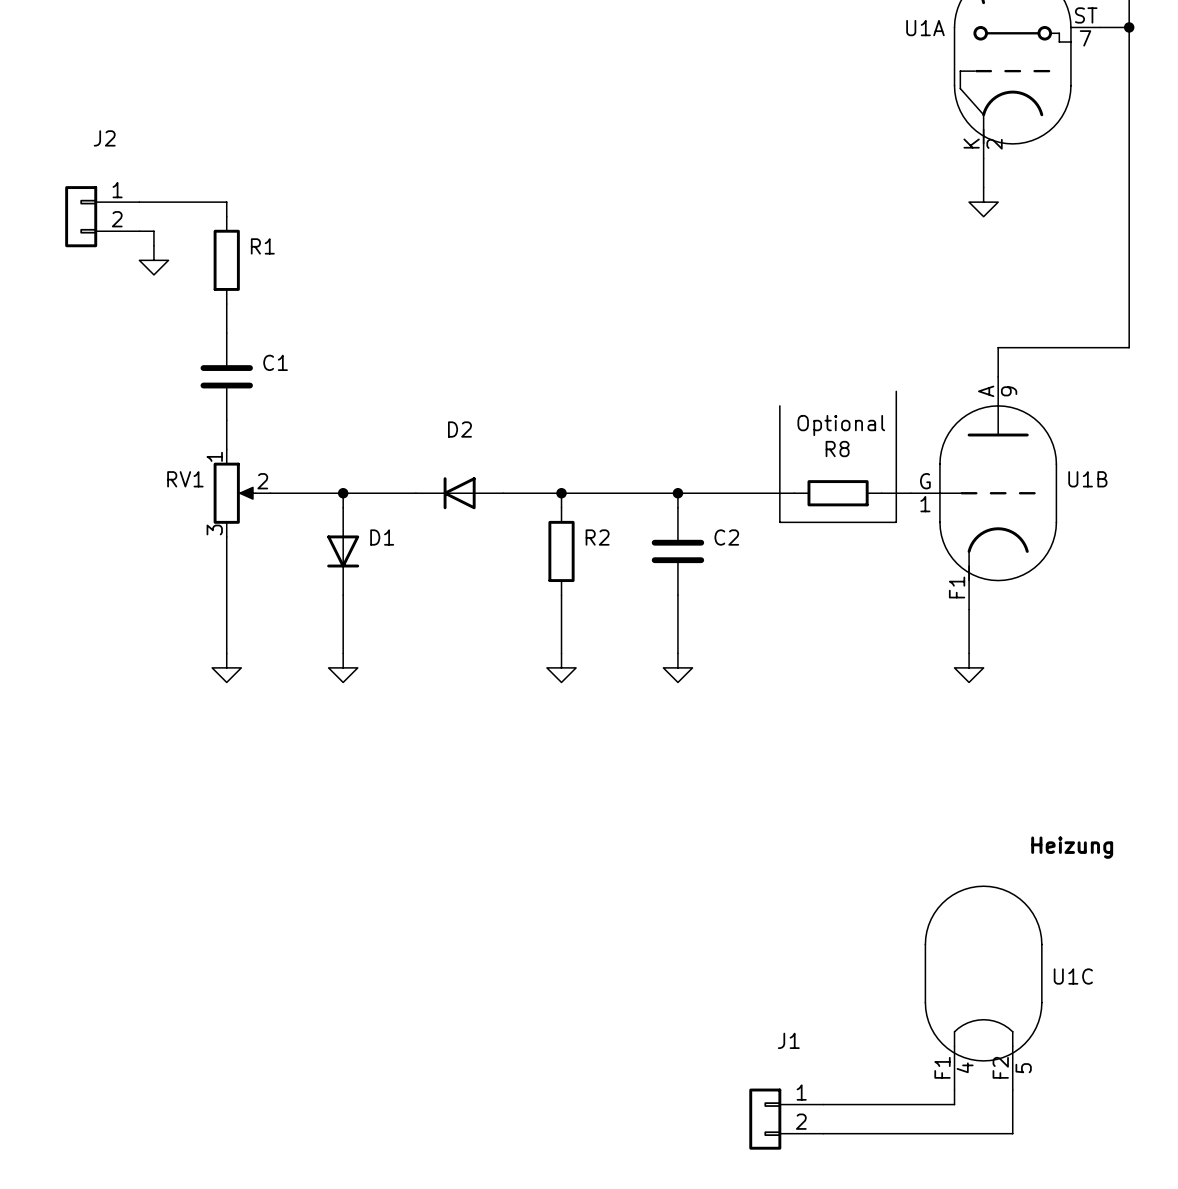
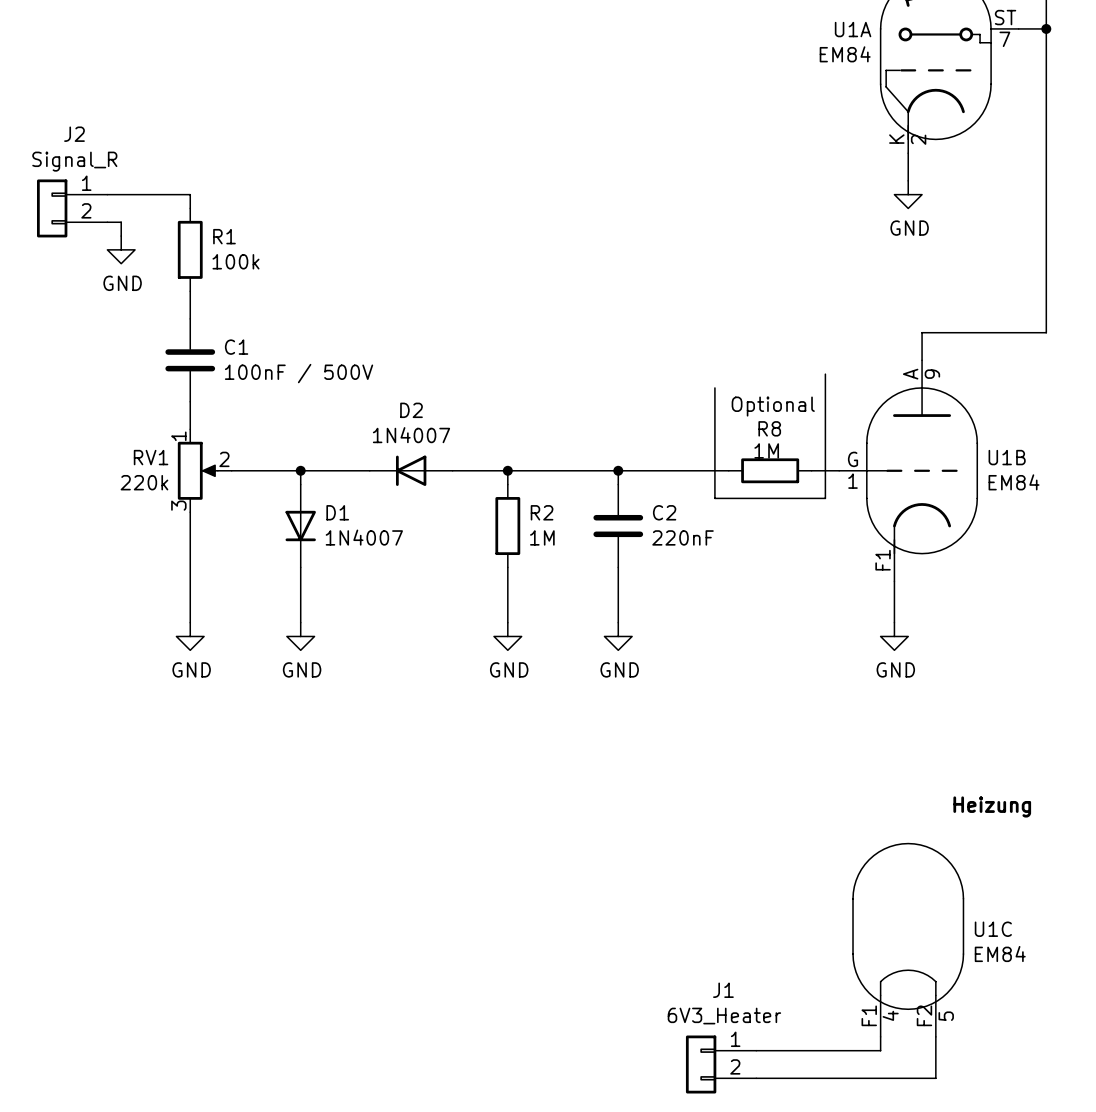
U1A value: none -> EM84 (845, 54)
J2 value: none -> Signal_R (74, 161)
power symbol text: none -> GND (909, 228)
R1 value: none -> 100k (235, 261)
power symbol text: none -> GND (122, 283)
C1 value: none -> 100nF / 500V (299, 373)
D2 value: none -> 1N4007 (411, 435)
R8 value: none -> 1M (766, 450)
RV1 value: none -> 220k (144, 482)
U1B value: none -> EM84 (1014, 482)
D1 value: none -> 1N4007 (364, 537)
R2 value: none -> 1M (542, 537)
C2 value: none -> 220nF (683, 537)
power symbol text: none -> GND (191, 669)
power symbol text: none -> GND (302, 669)
power symbol text: none -> GND (509, 669)
power symbol text: none -> GND (619, 669)
power symbol text: none -> GND (895, 669)
U1C value: none -> EM84 (1000, 954)
J1 value: none -> 6V3_Heater (724, 1016)

